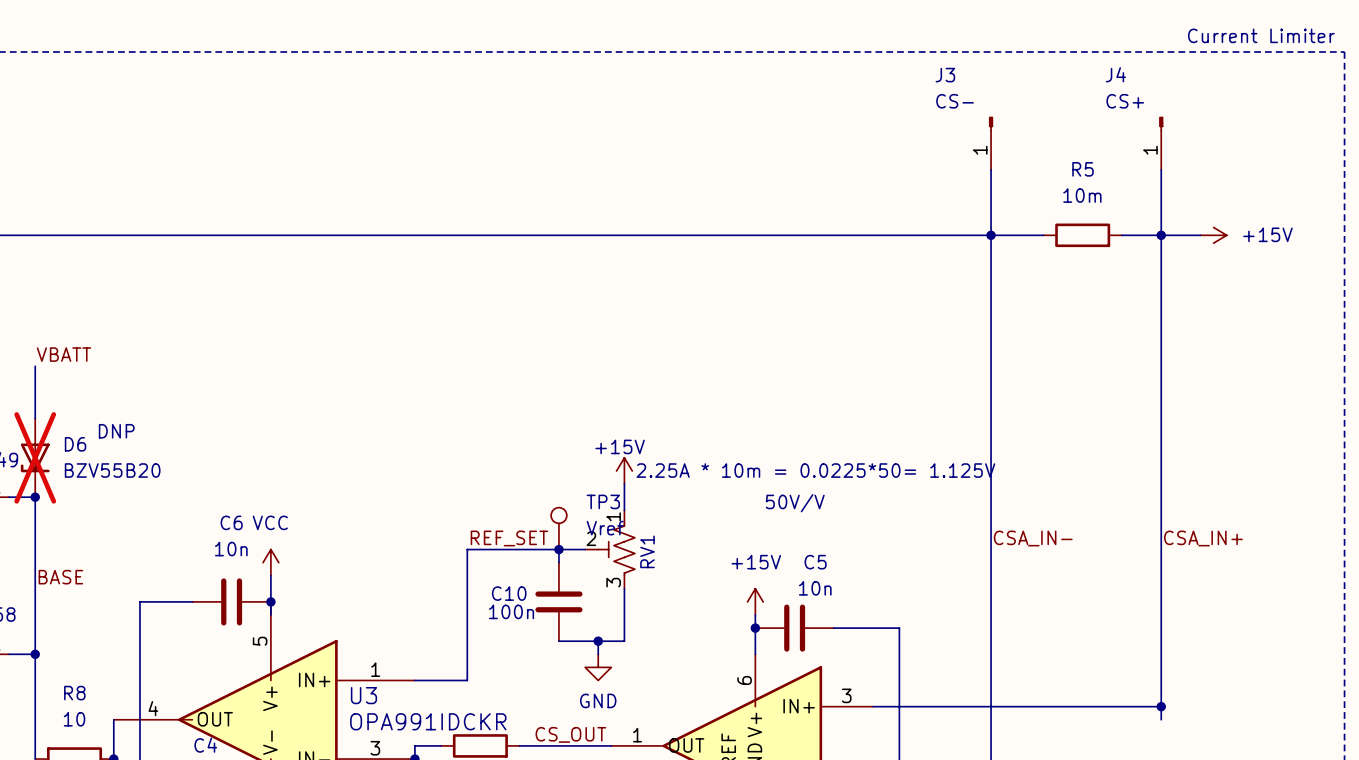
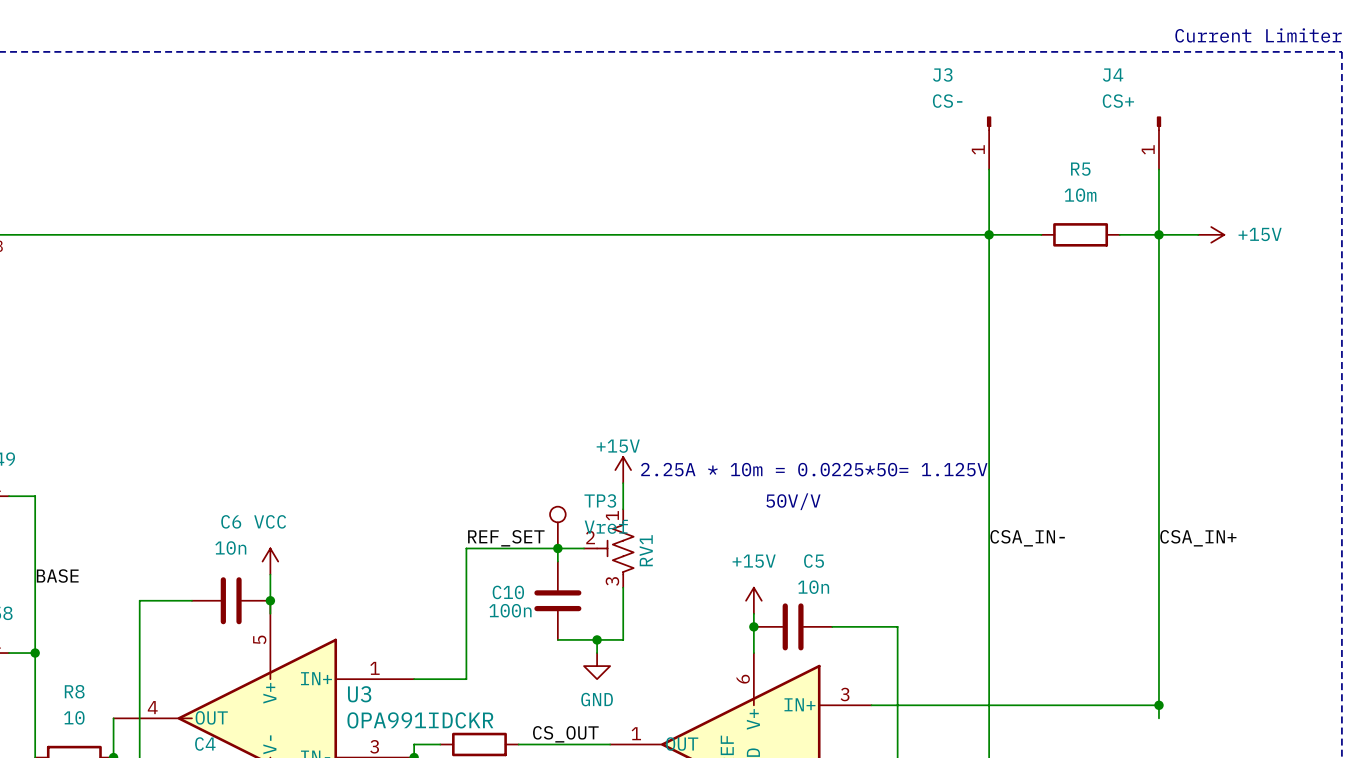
label: VBATT (64, 354) -> none
wire: (35, 366) (35, 418) -> none
text: DNP (116, 431) -> none
D6: BZV55B20 (35, 457) -> none
junction: (35, 497) -> none

